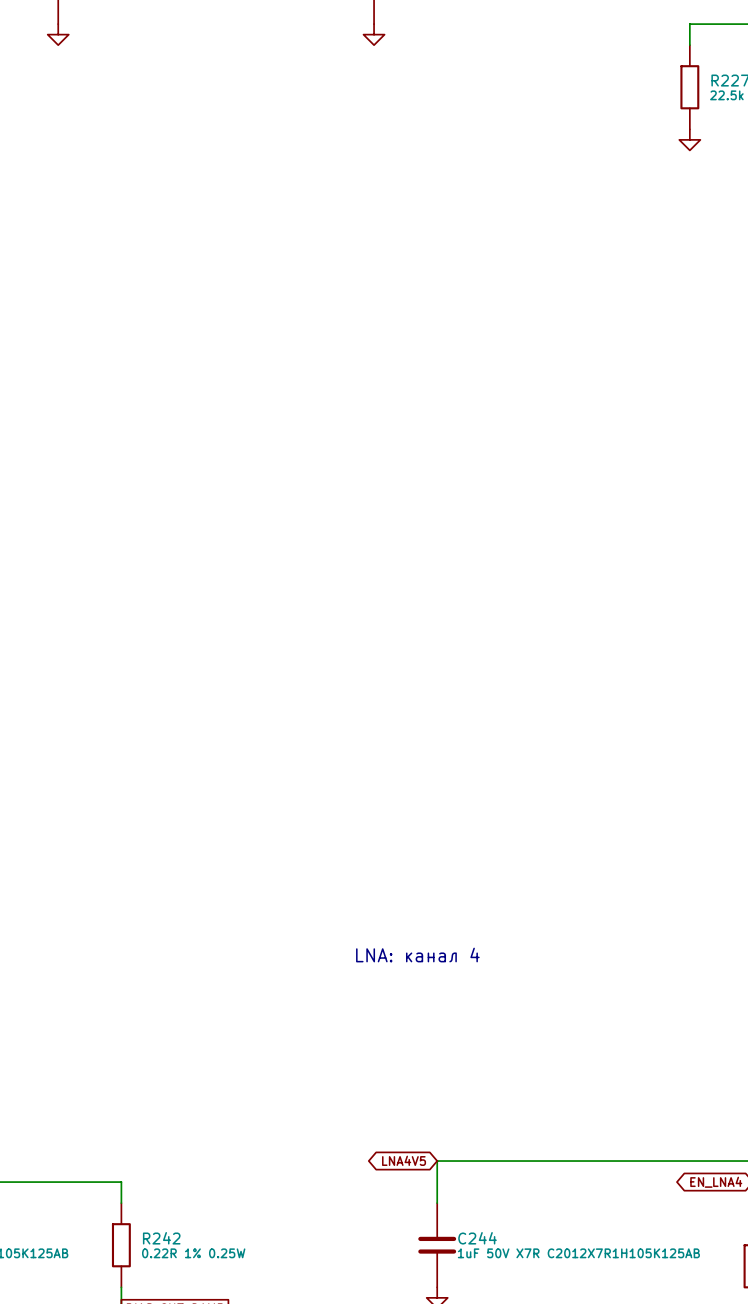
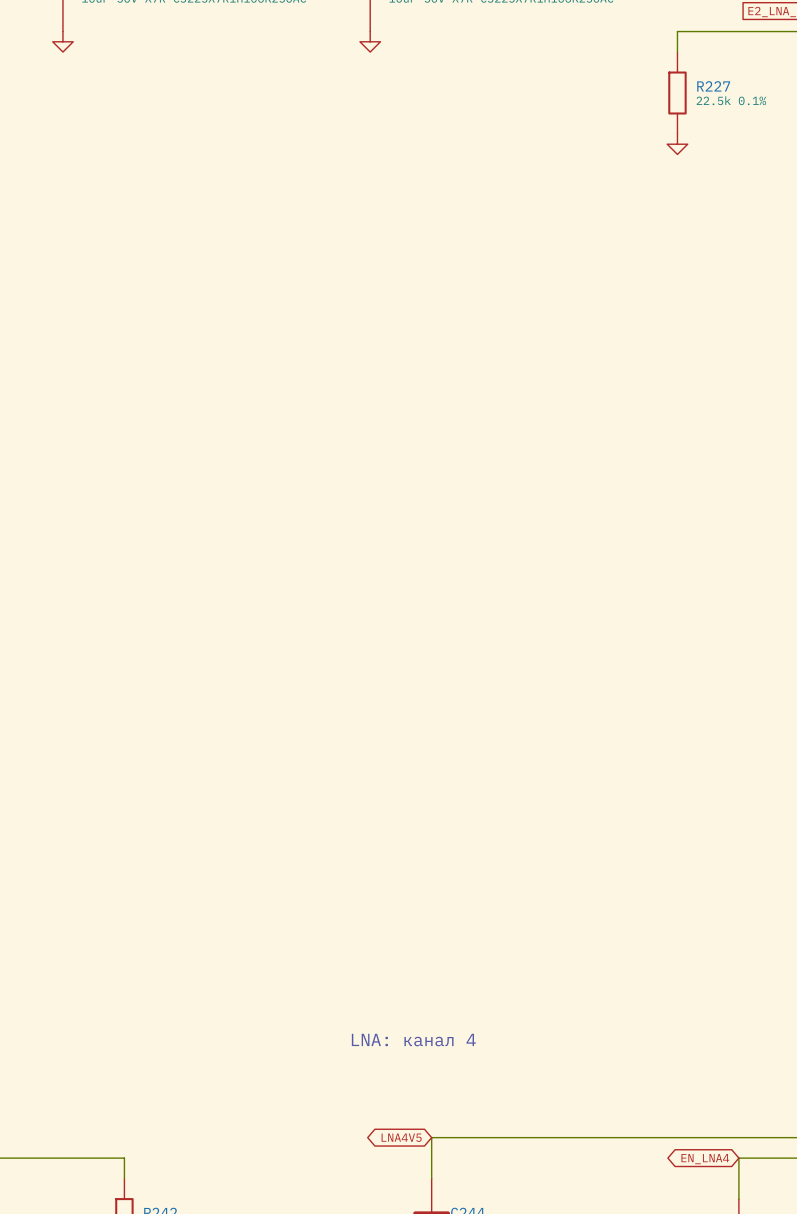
text position: LNA: канал 4 (417, 955) -> LNA: канал 4 (413, 1040)

